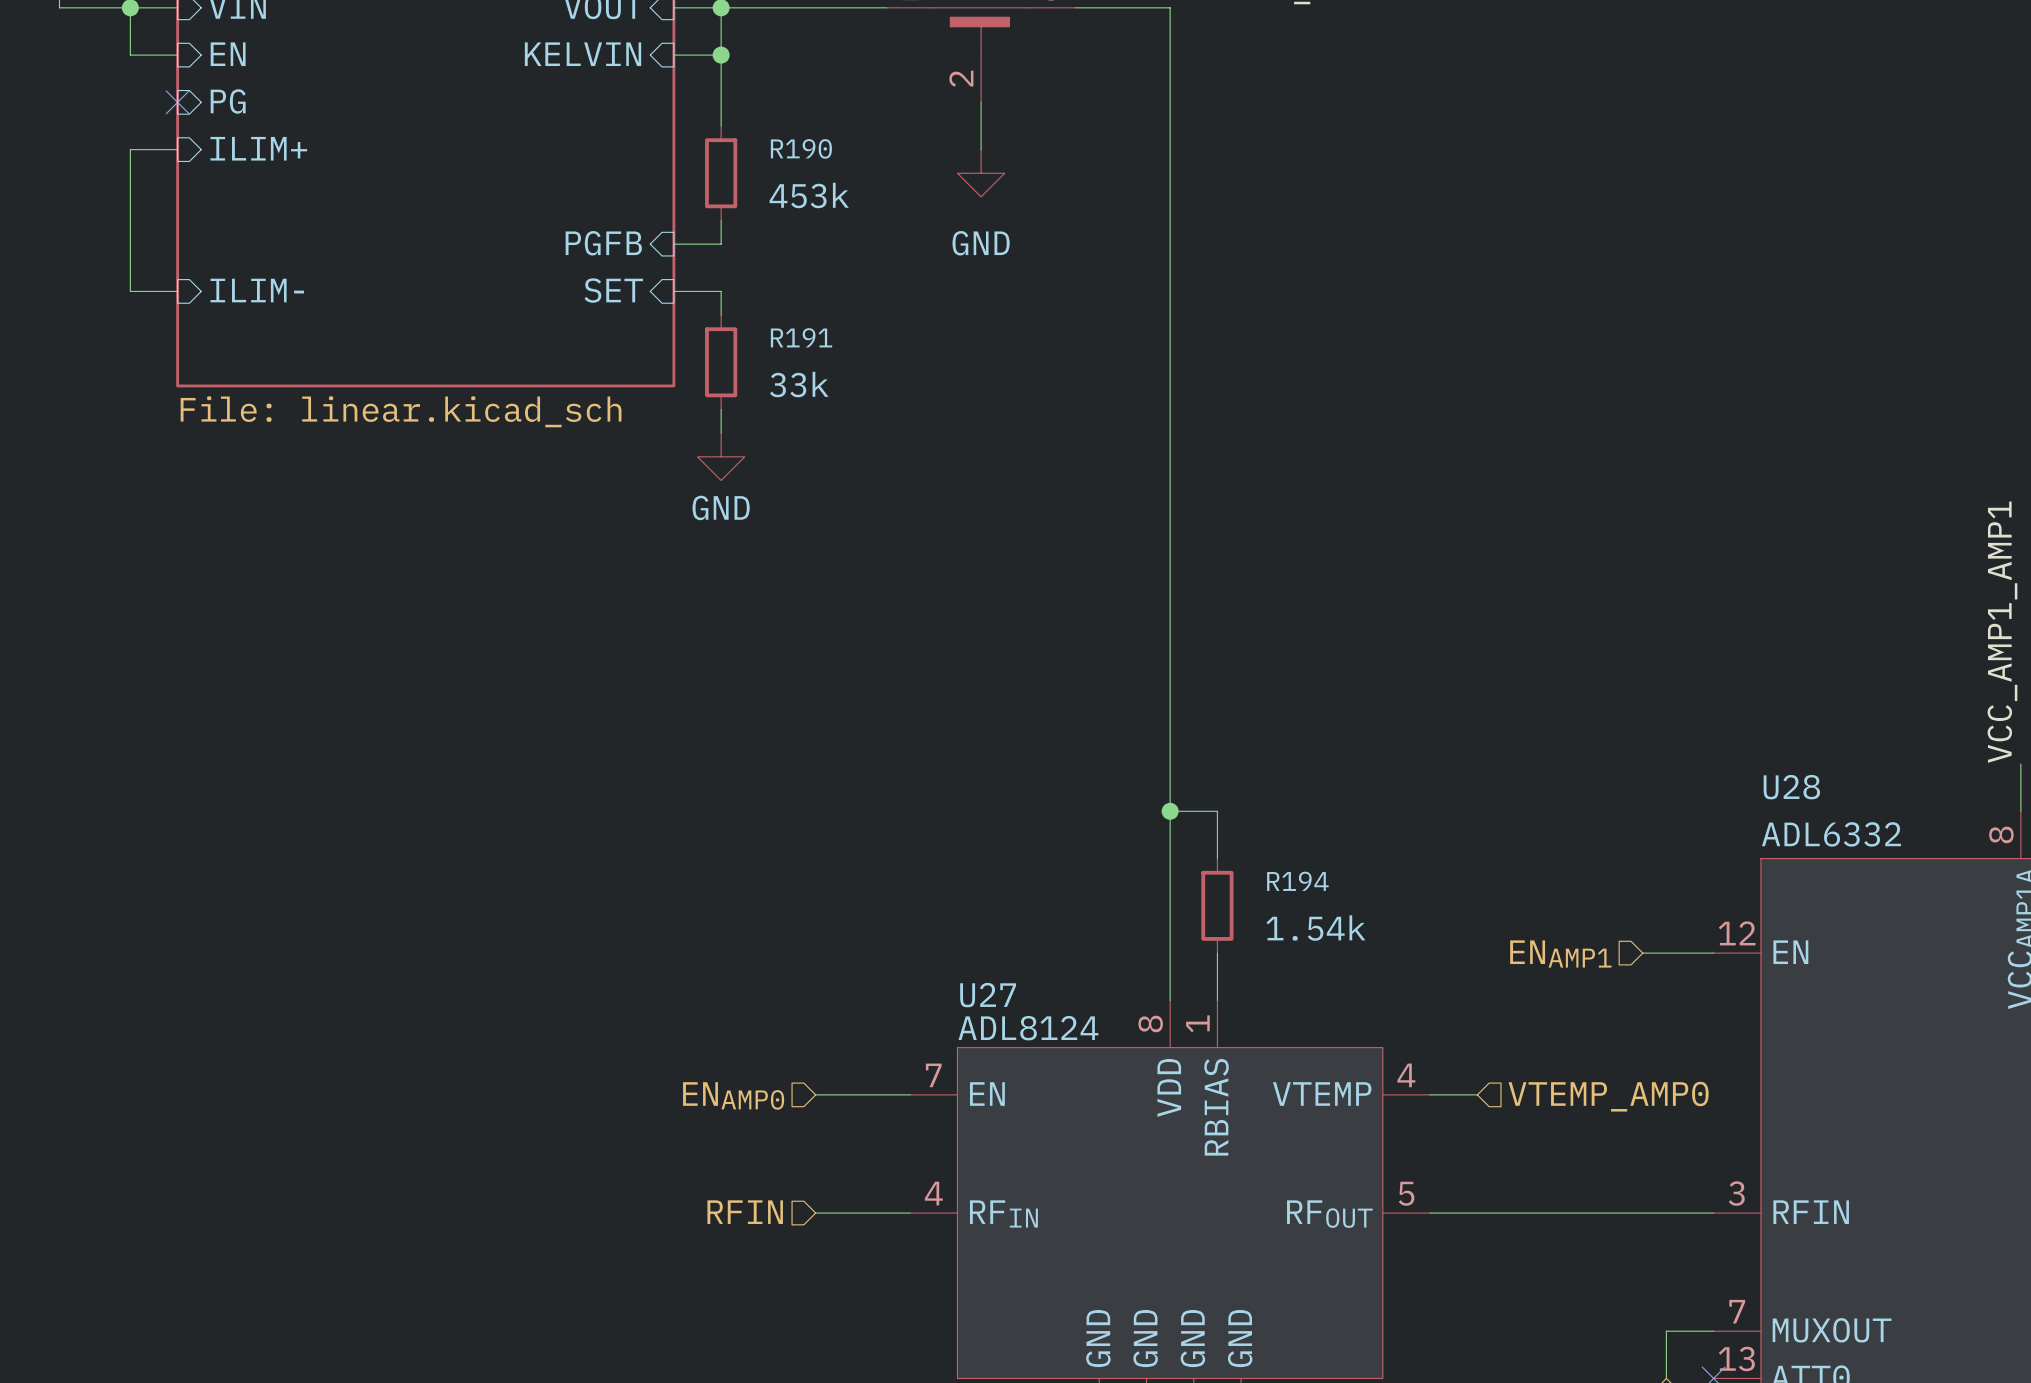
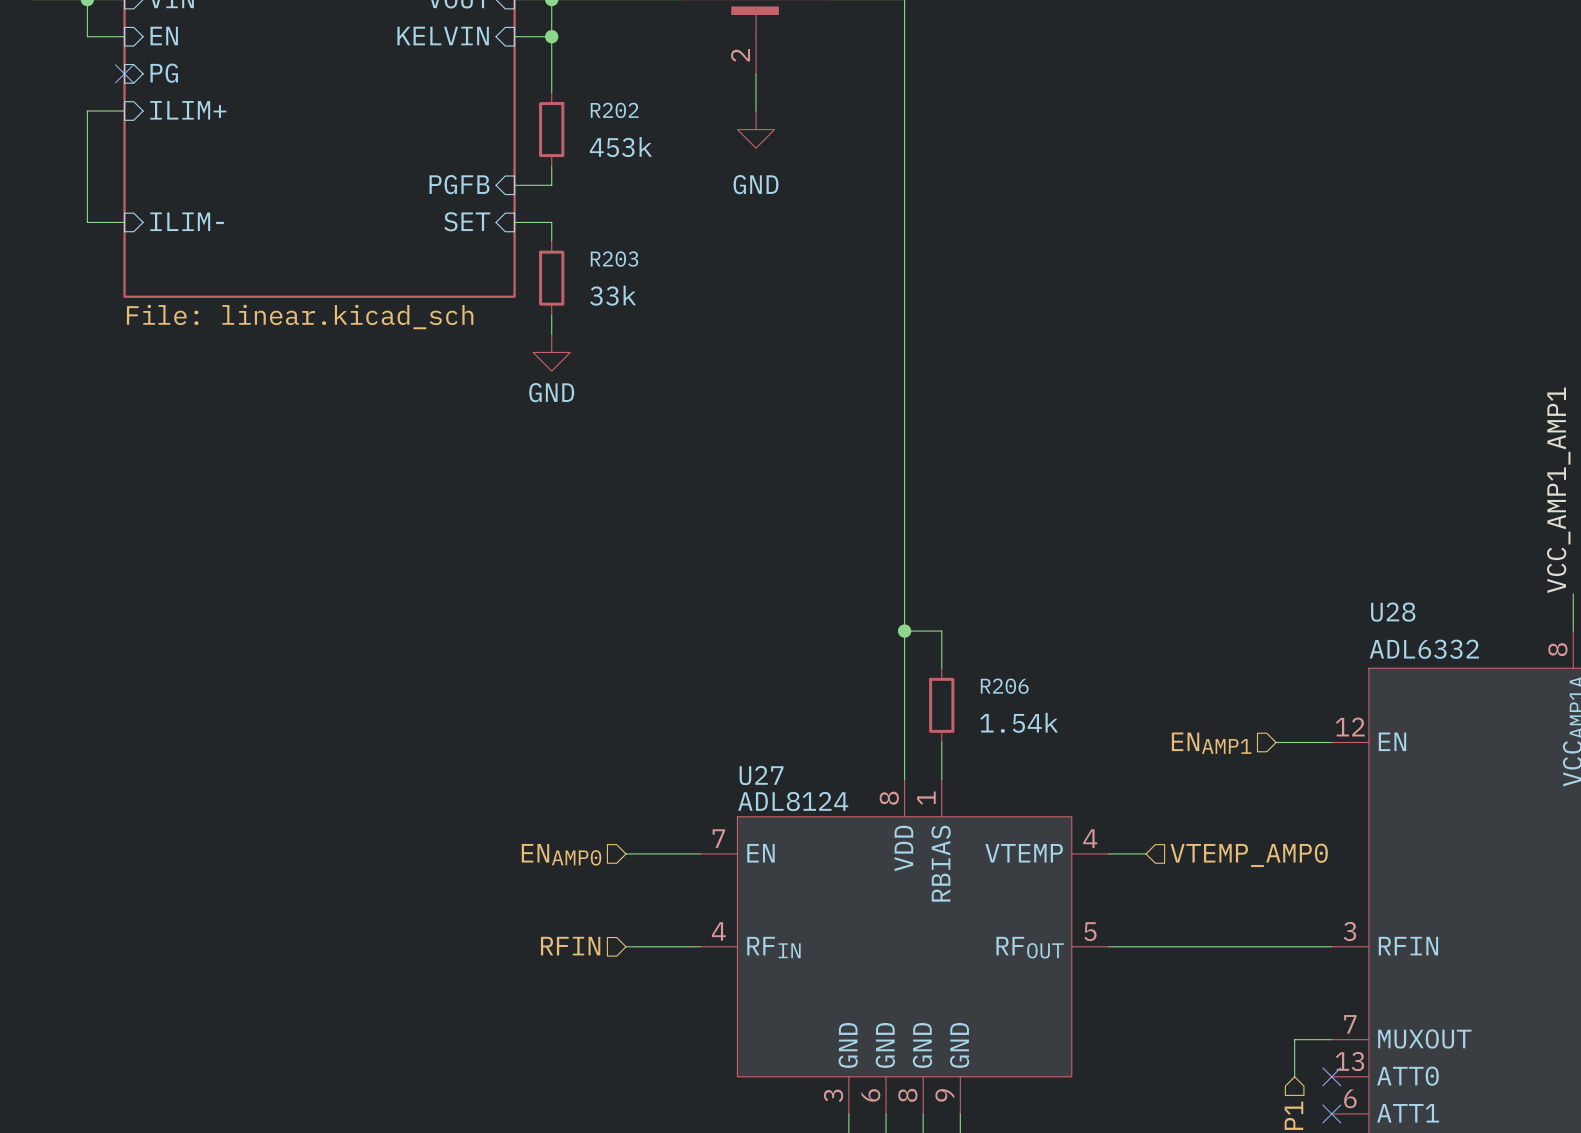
R190 name: R190 (801, 148) -> R202 (614, 110)
R191 name: R191 (801, 337) -> R203 (614, 259)
R194 name: R194 (1297, 881) -> R206 (1004, 686)

